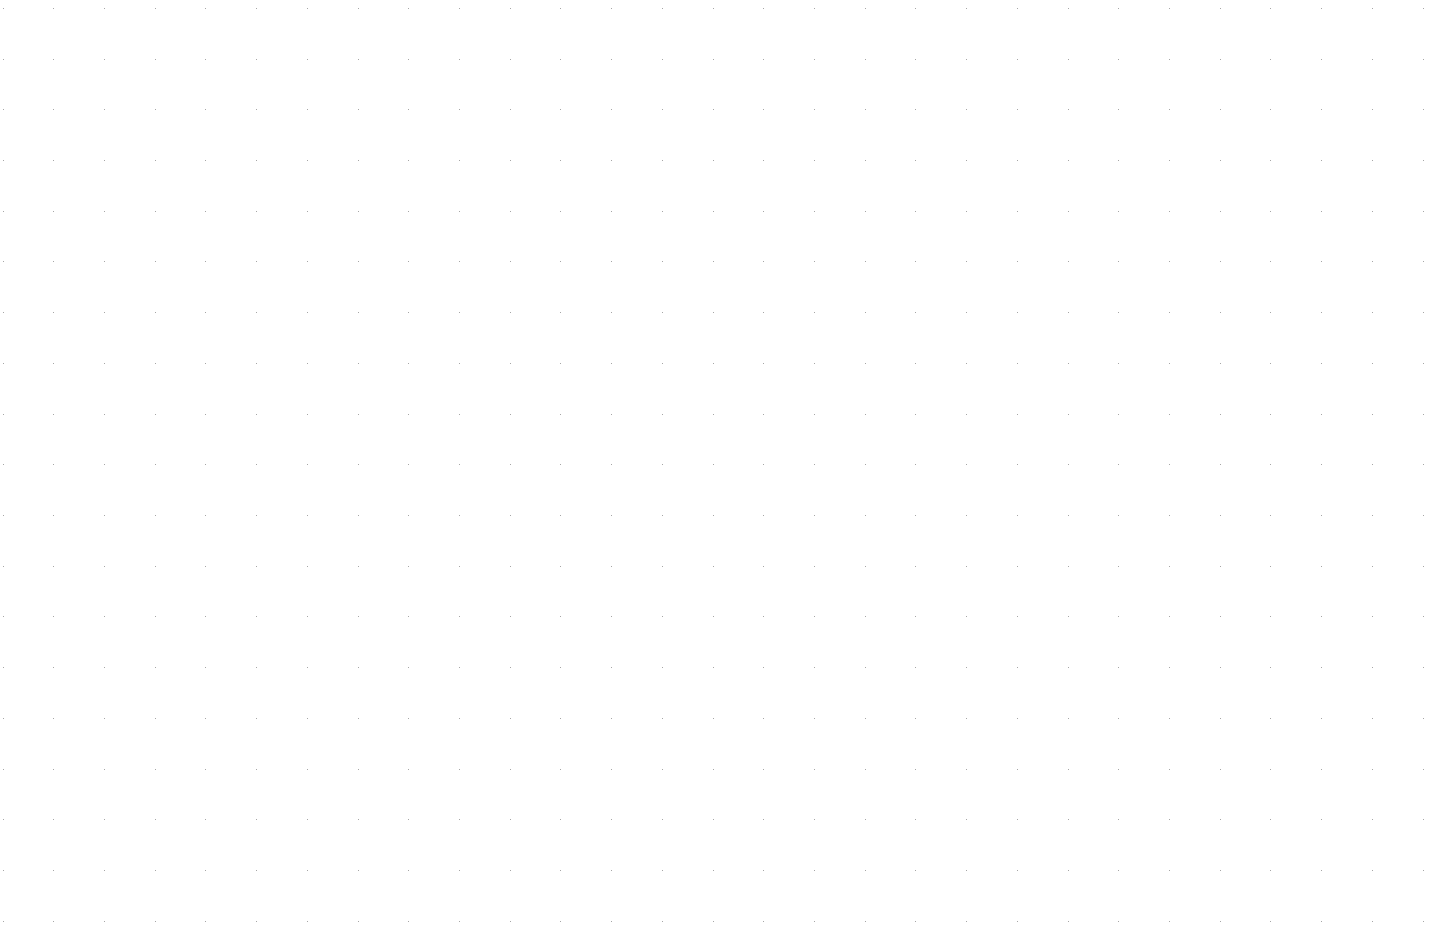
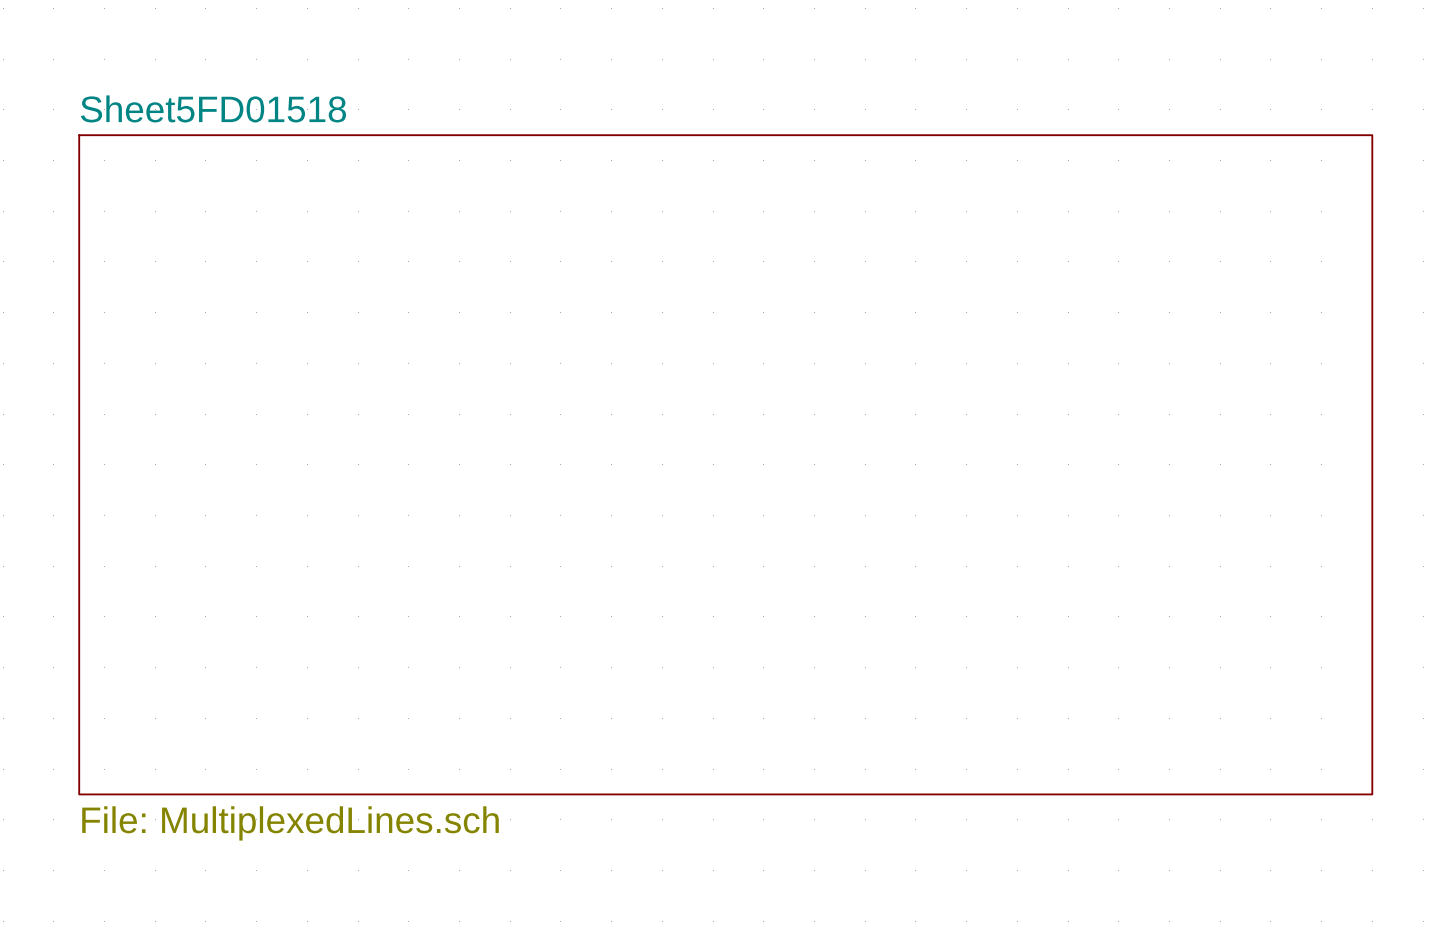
sheet Sheet5FD01518: none -> File: MultiplexedLines.sch (725, 464)

